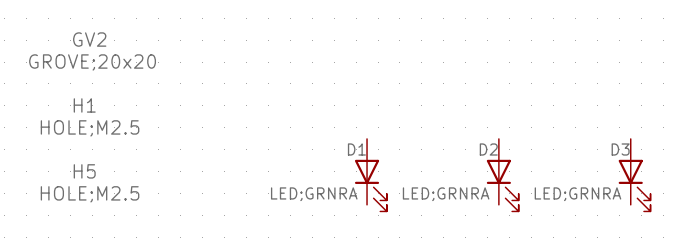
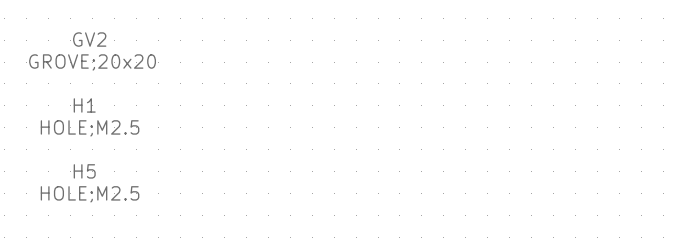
D1: LED;GRNRA (370, 175) -> none
D2: LED;GRNRA (502, 175) -> none
D3: LED;GRNRA (634, 175) -> none

